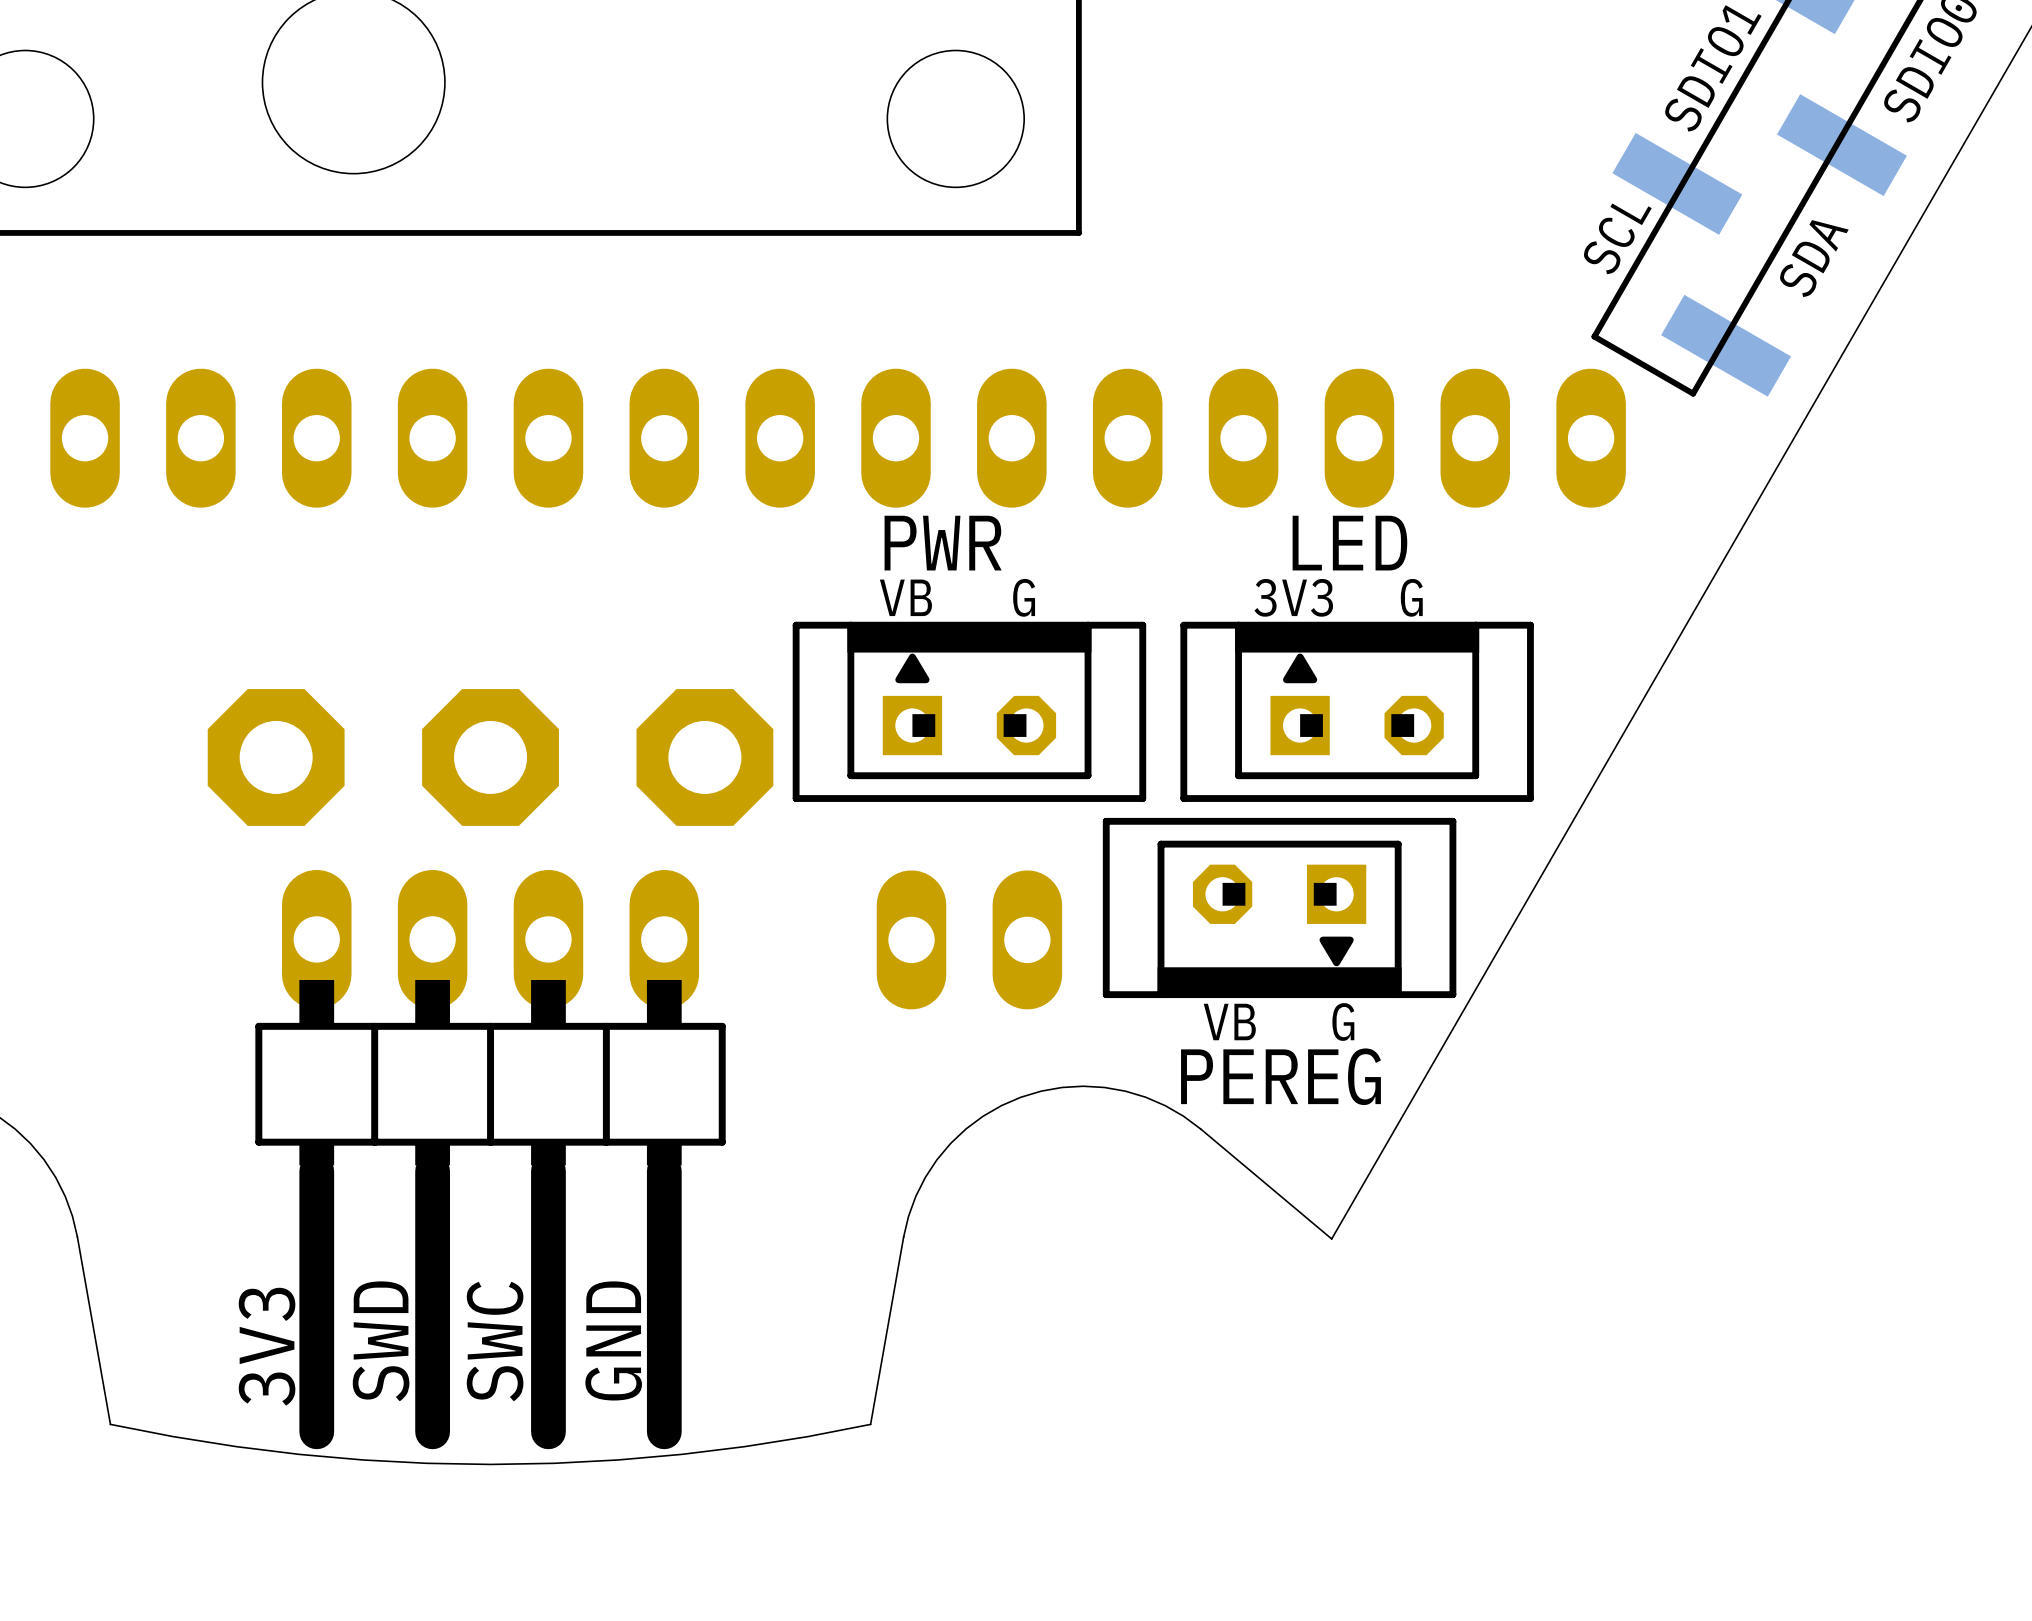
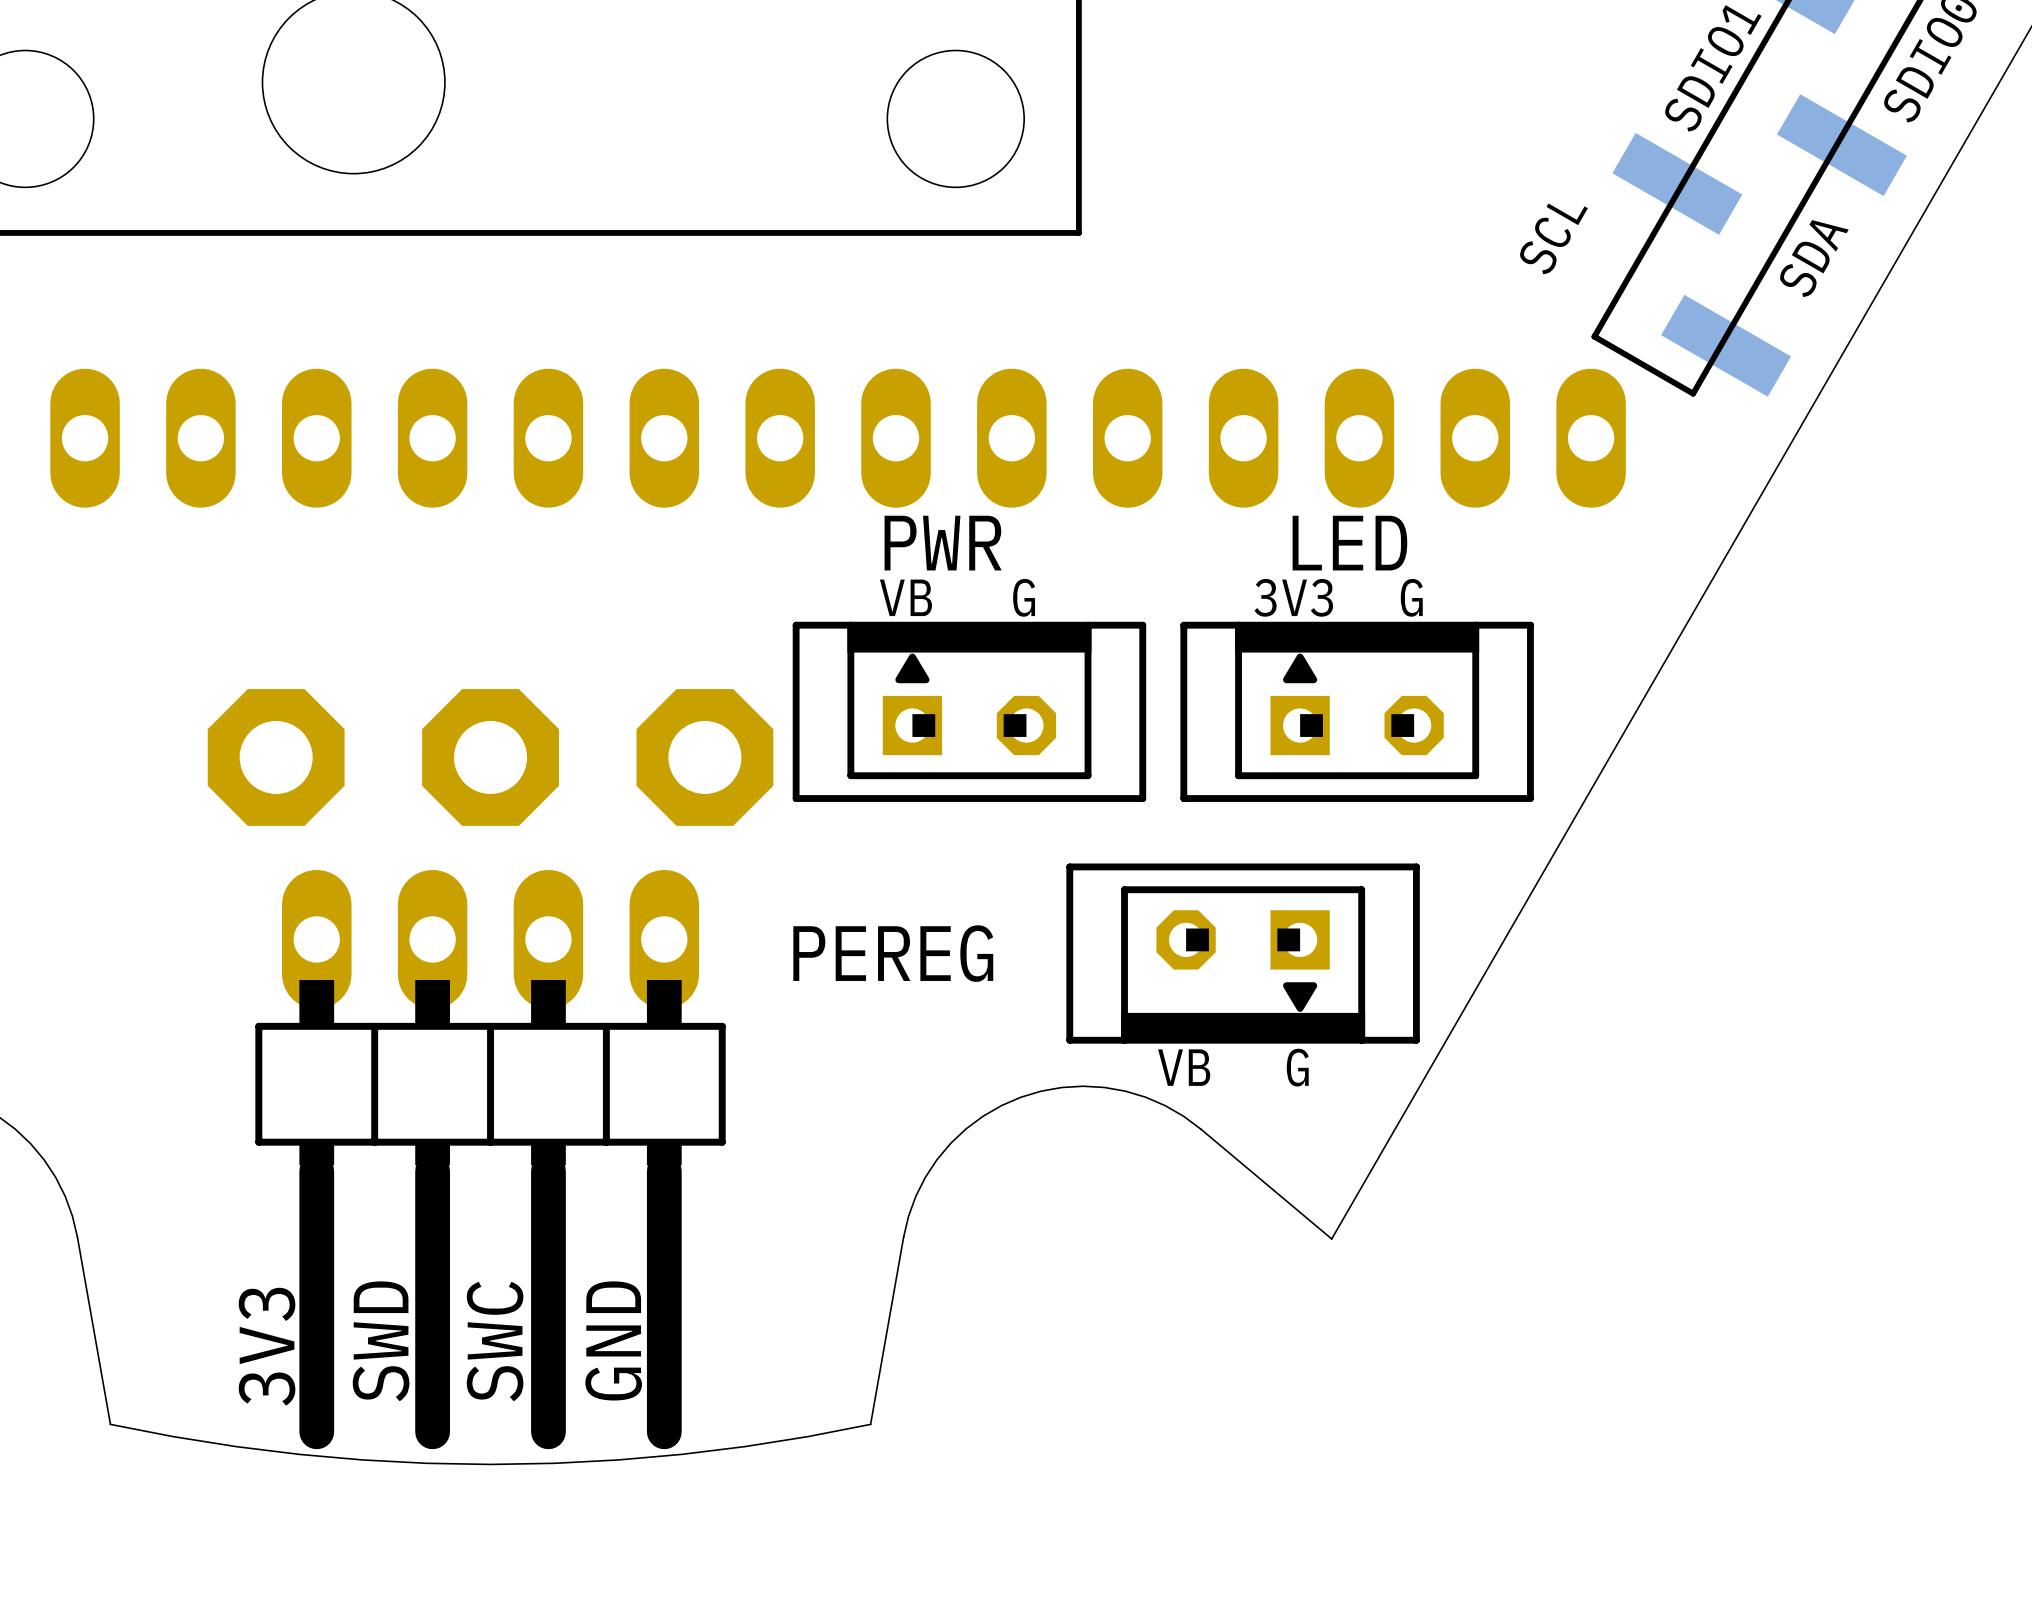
text position: SCL (1617, 238) -> SCL (1553, 238)
part position: (1279, 907) -> (1243, 953)
part: (969, 939) -> none
text: none -> PEREG (893, 953)
text: VB (1229, 1022) -> none
text position: G (1343, 1022) -> G (1297, 1067)
text: PEREG (1280, 1076) -> VB (1184, 1067)

